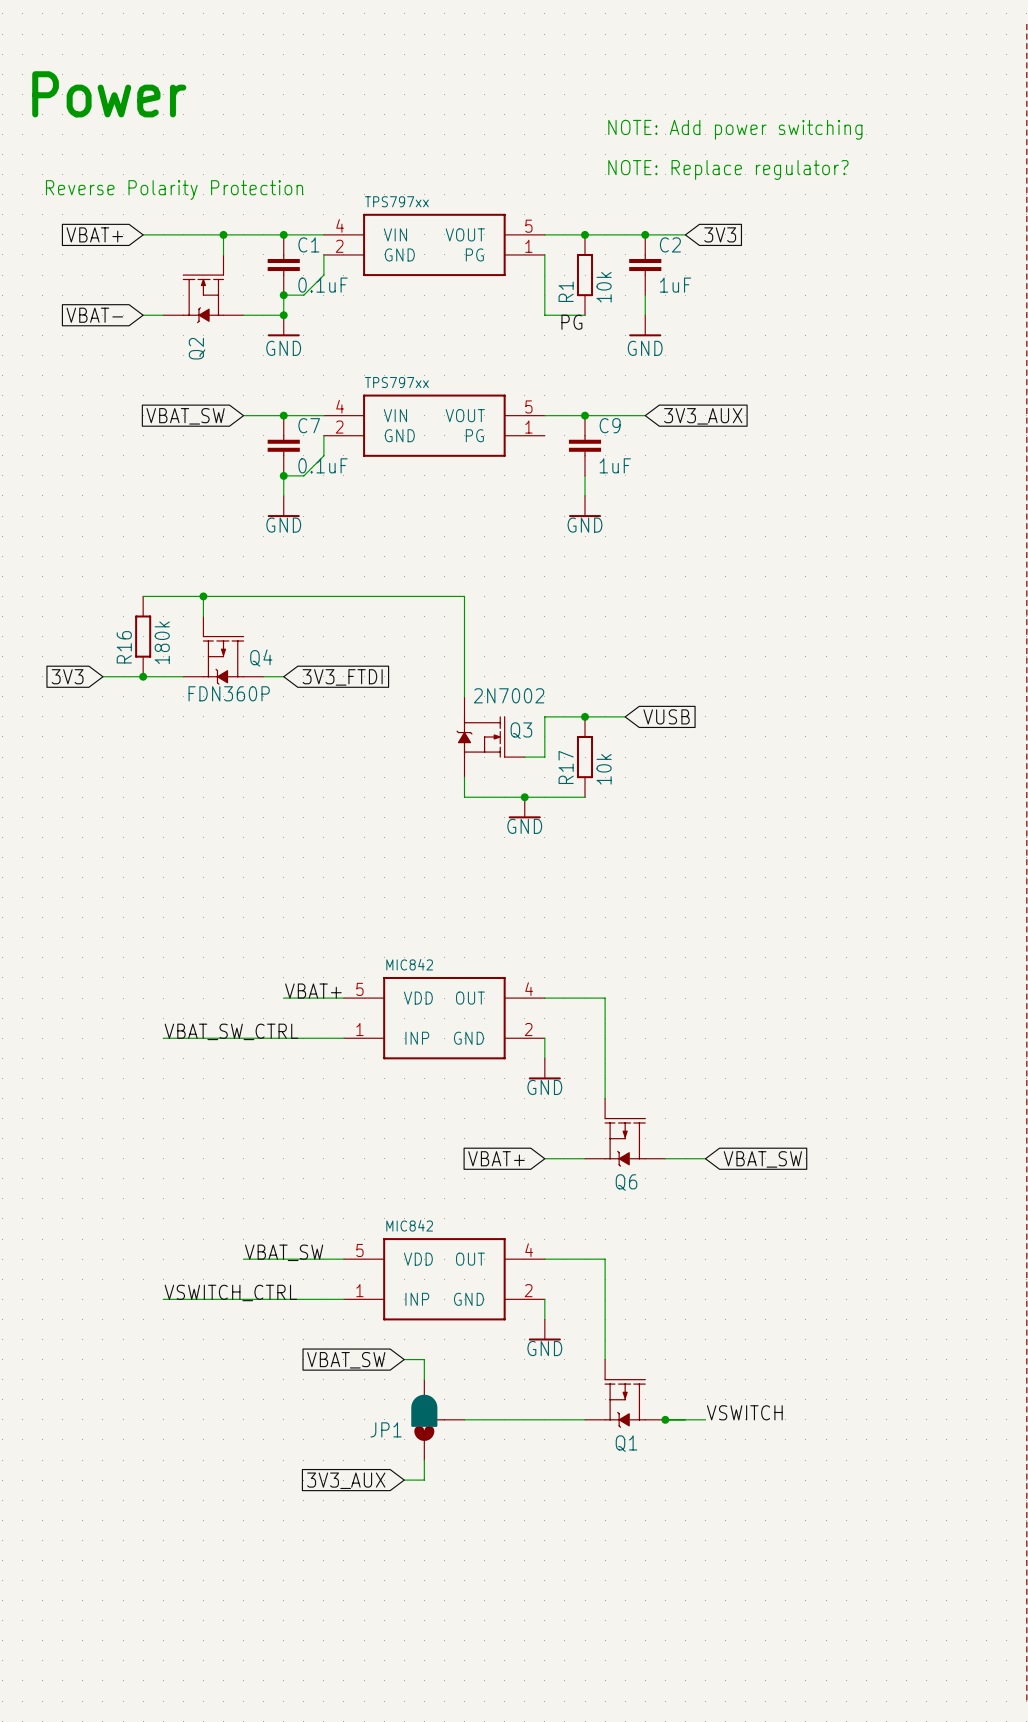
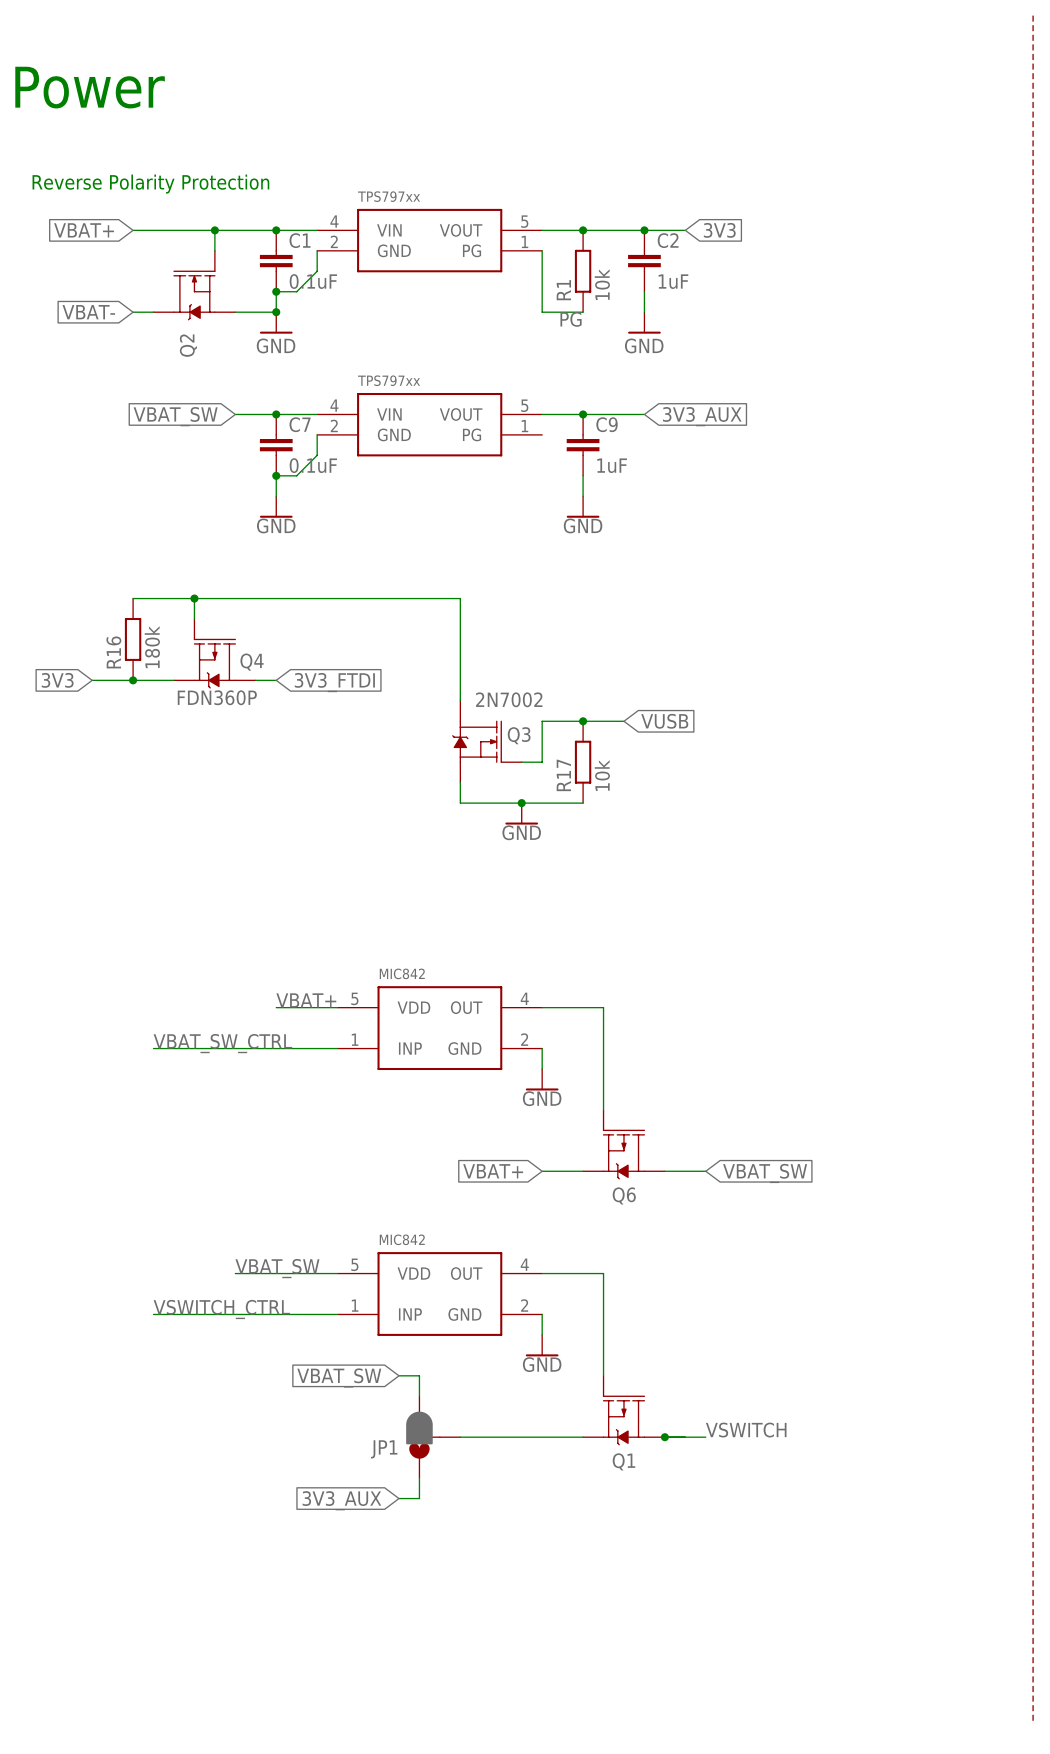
text: NOTE: Add power switching (735, 129) -> none
text: NOTE: Replace regulator? (728, 169) -> none

